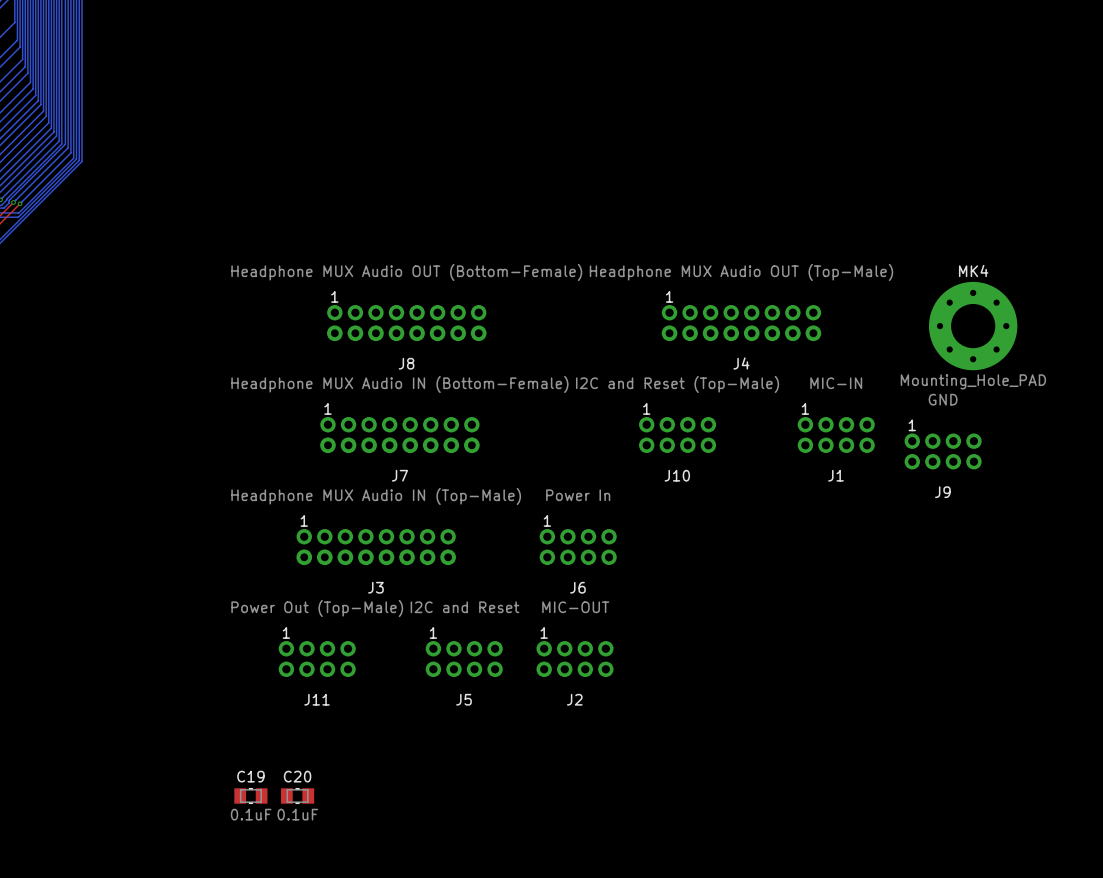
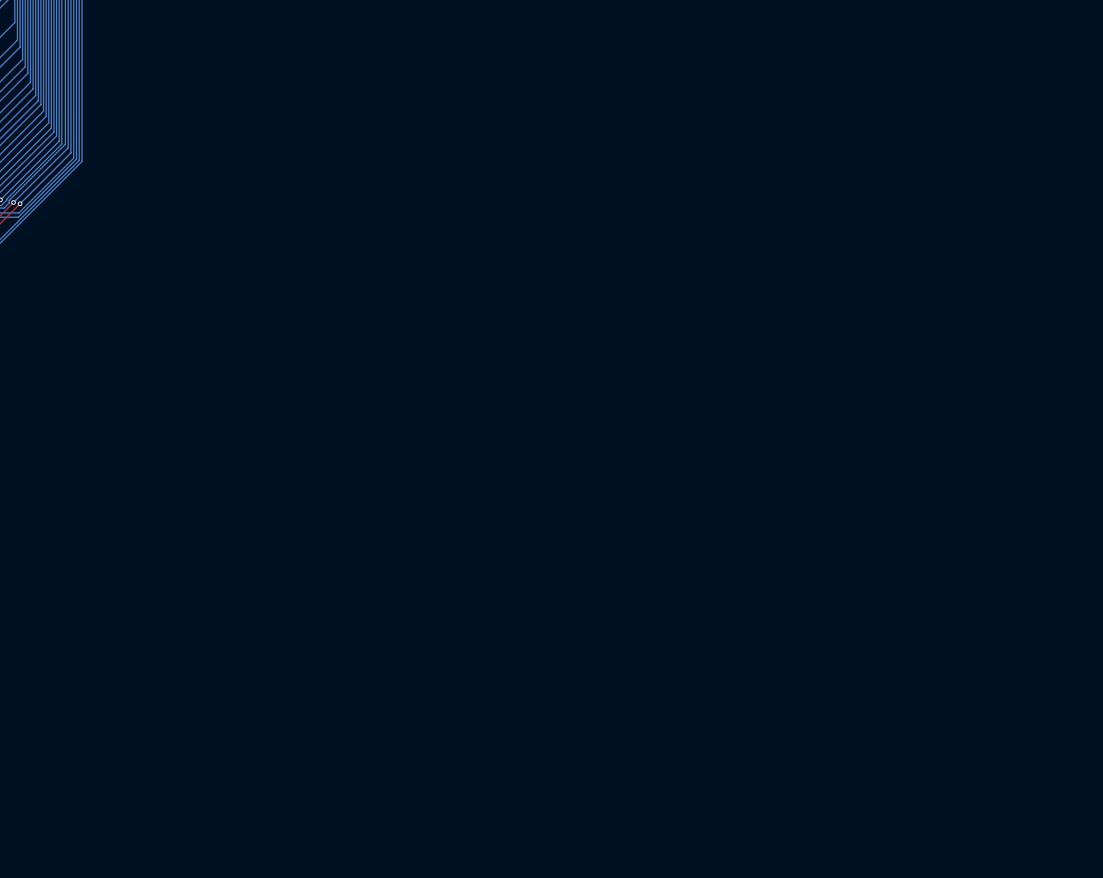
J8: Headphone MUX Audio OUT (Bottom-Female) (406, 323) -> none
J4: Headphone MUX Audio OUT (Top-Male) (741, 323) -> none
MK4: Mounting_Hole_PAD (973, 326) -> none
J7: Headphone MUX Audio IN (Bottom-Female) (399, 435) -> none
J10: I2C and Reset (Top-Male) (677, 435) -> none
J1: MIC-IN (836, 435) -> none
J9: GND (943, 451) -> none
J3: Headphone MUX Audio IN (Top-Male) (376, 547) -> none
J6: Power In (578, 547) -> none
J11: Power Out (Top-Male) (317, 659) -> none
J5: I2C and Reset (464, 659) -> none
J2: MIC-OUT (575, 659) -> none
C19: 0.1uF (250, 796) -> none
C20: 0.1uF (297, 796) -> none

